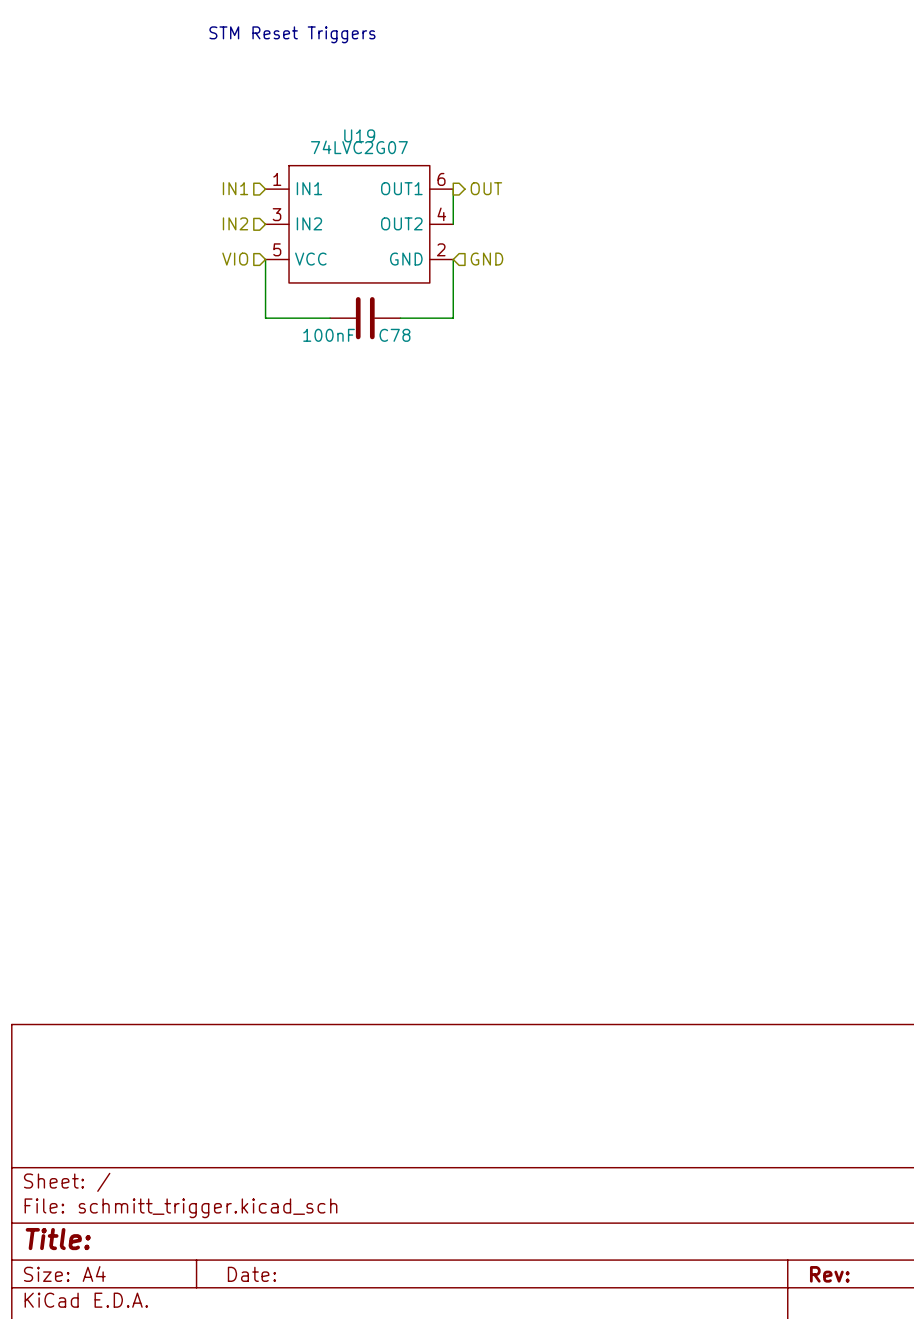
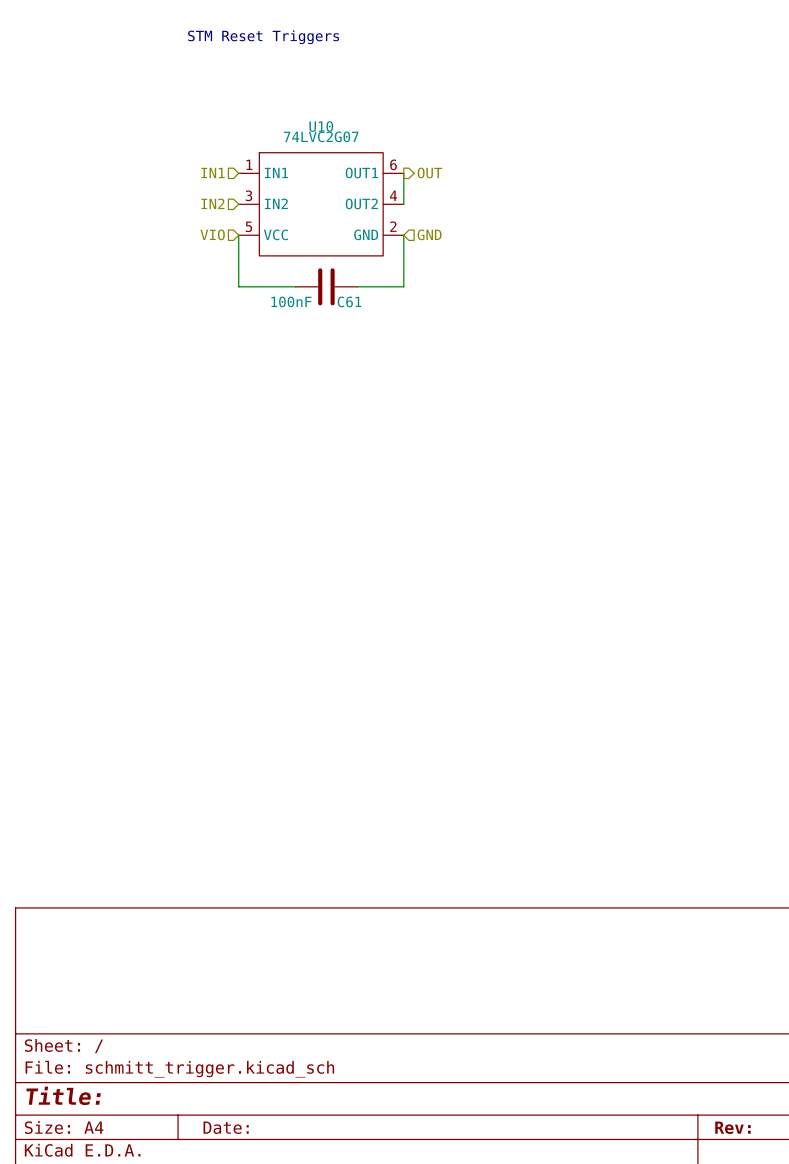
U19 name: U19 (359, 135) -> U10 (321, 126)
C78 name: C78 (394, 335) -> C61 (349, 301)

